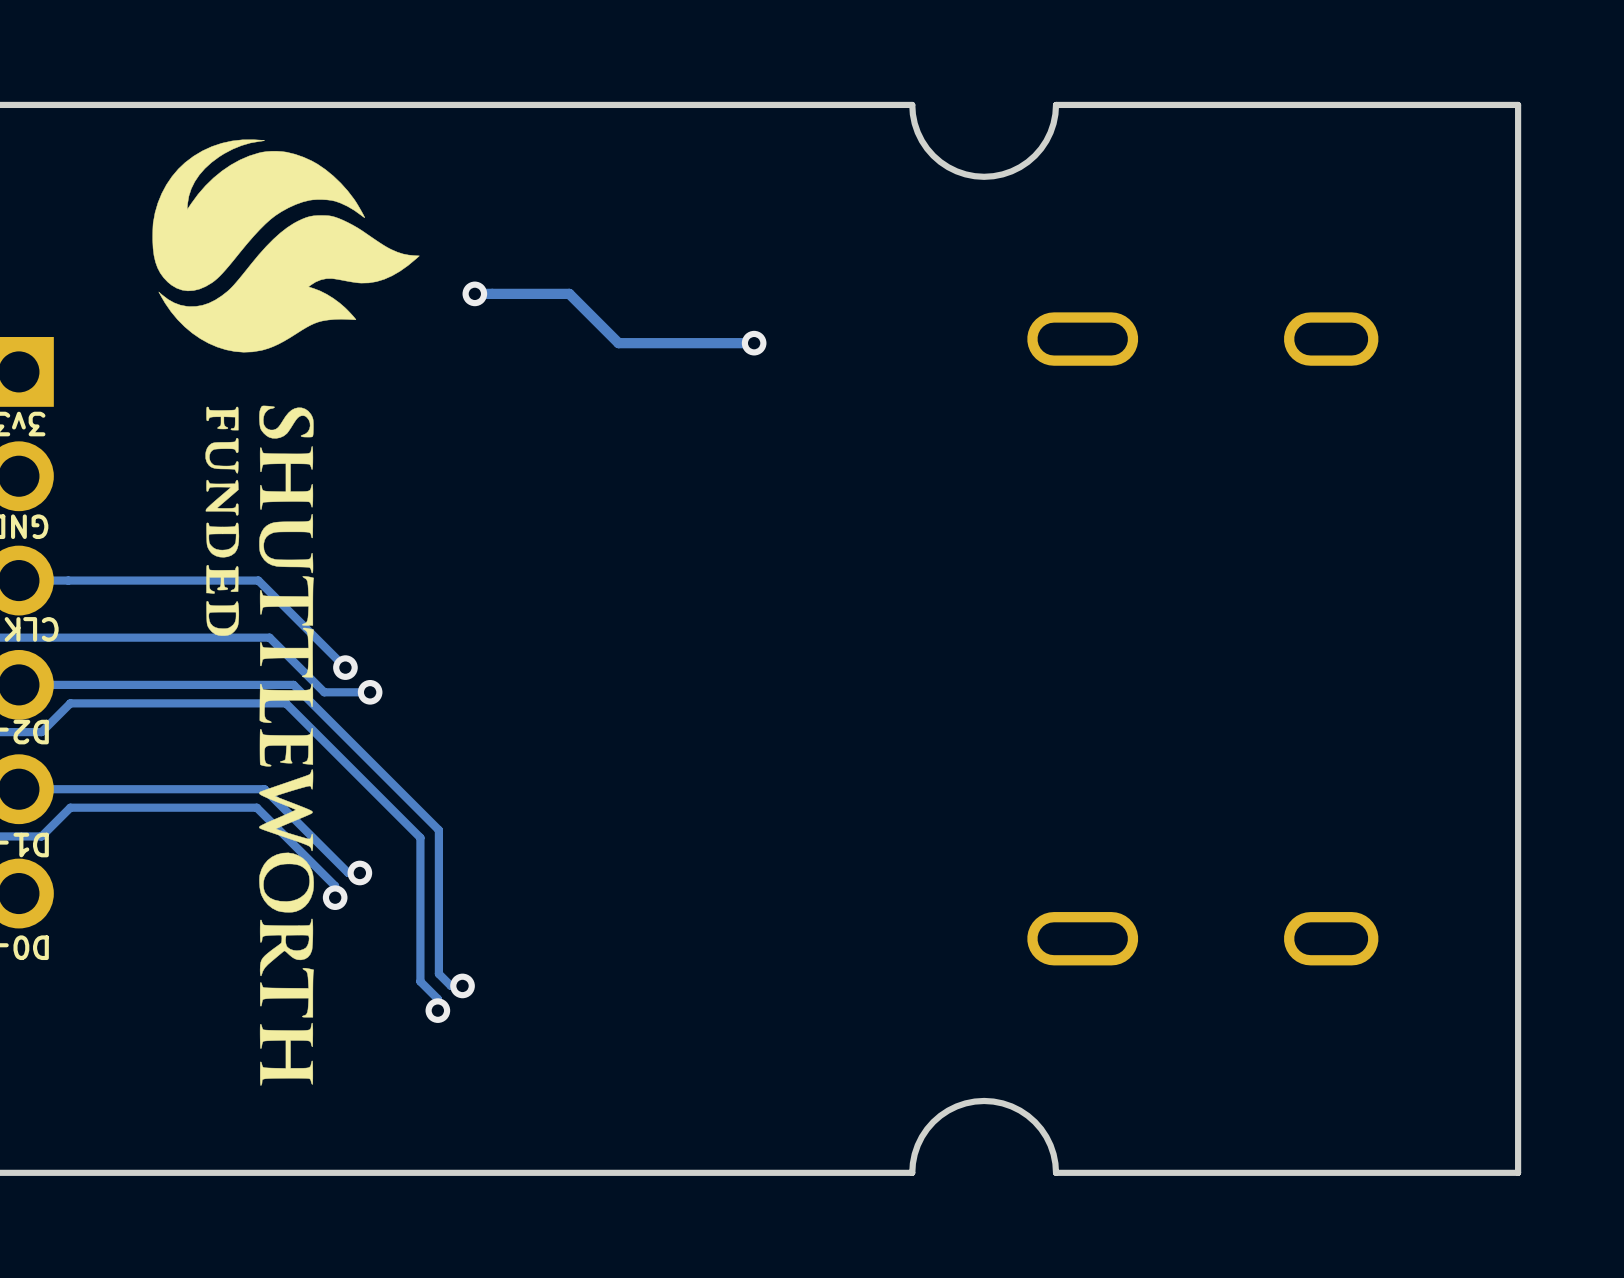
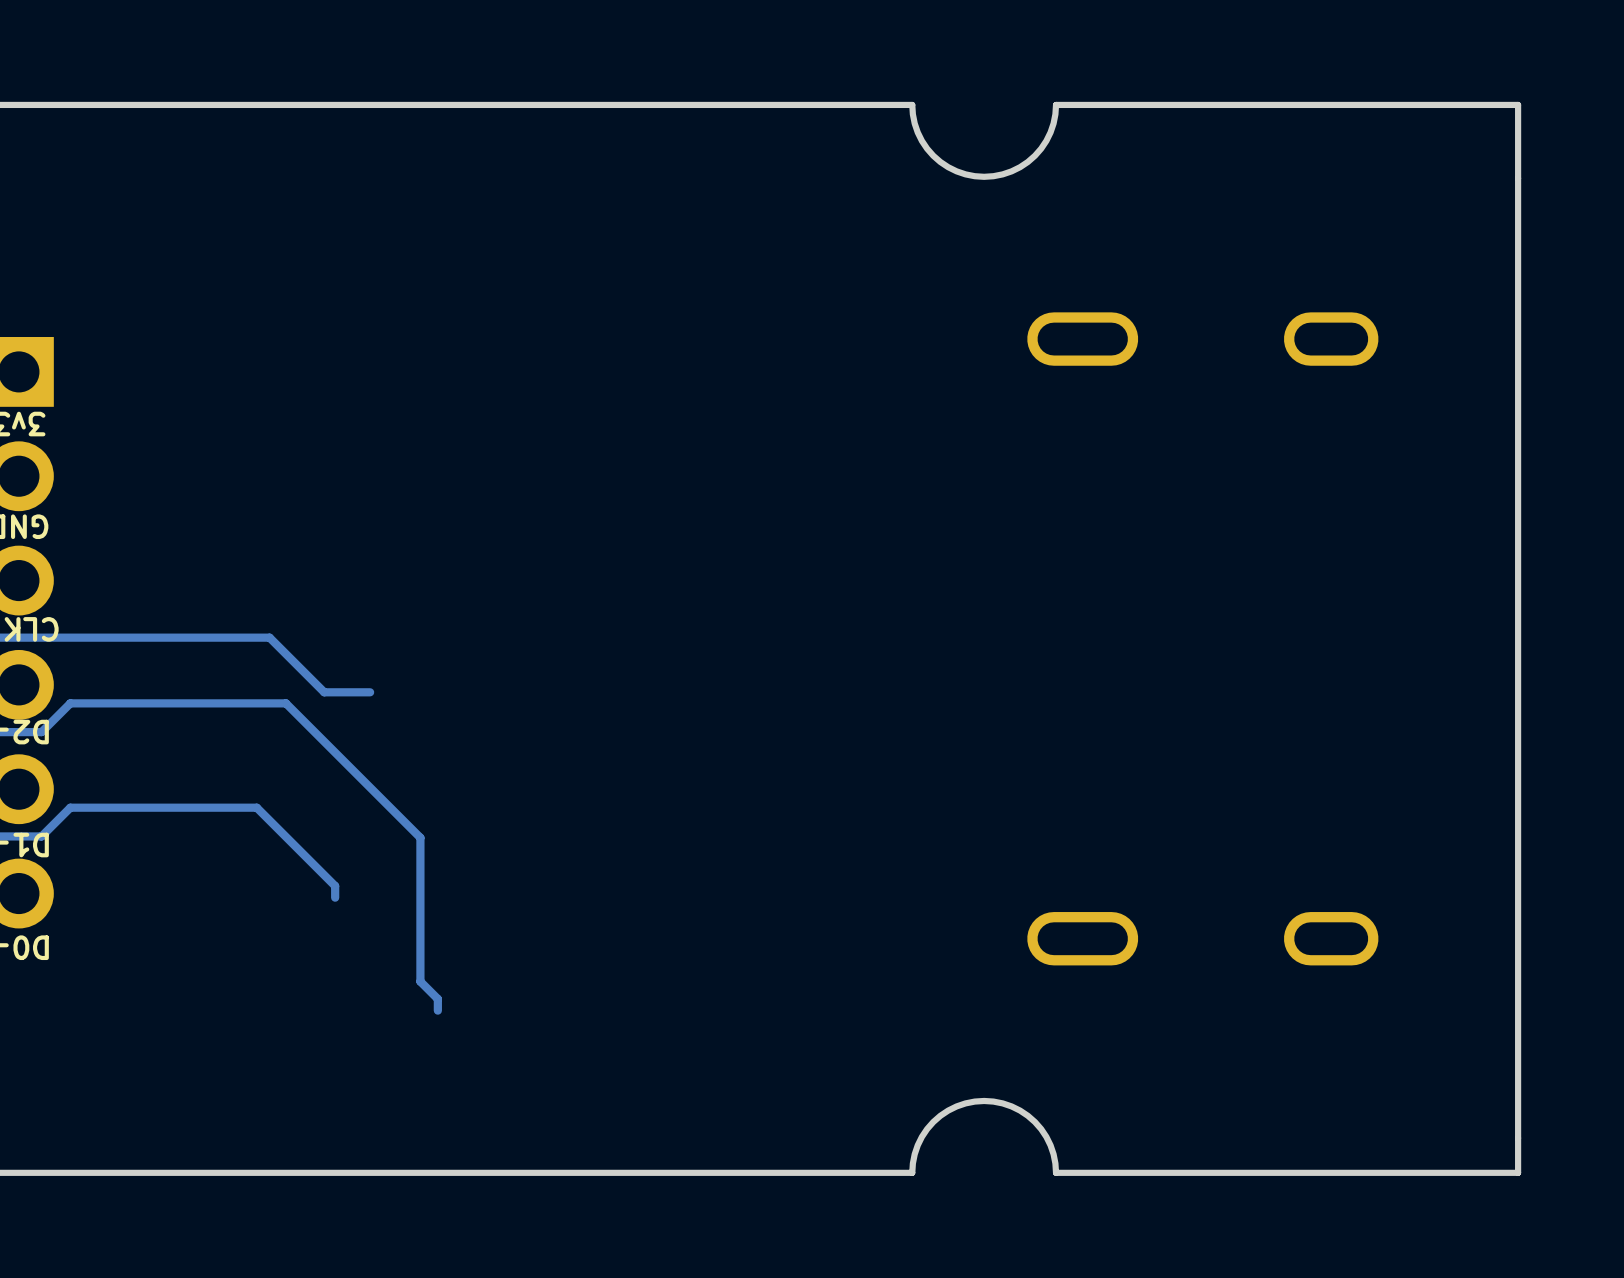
drawing: [152, 139, 420, 1086] -> none
track: (474, 293) (569, 293) (618, 343) (754, 343) -> none
via: (474, 293) -> none
via: (754, 343) -> none
track: (18, 580) (258, 580) (345, 667) -> none
via: (345, 667) -> none
track: (18, 684) (293, 684) (438, 830) (438, 973) (450, 985) (462, 985) -> none
via: (370, 692) -> none
track: (37, 789) (264, 789) (348, 872) (359, 872) -> none
via: (359, 872) -> none
via: (335, 897) -> none
via: (462, 985) -> none
via: (437, 1010) -> none

